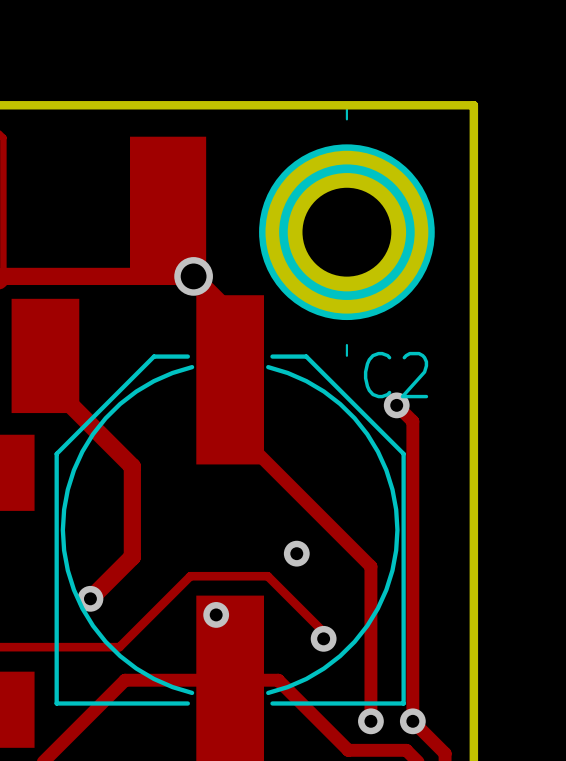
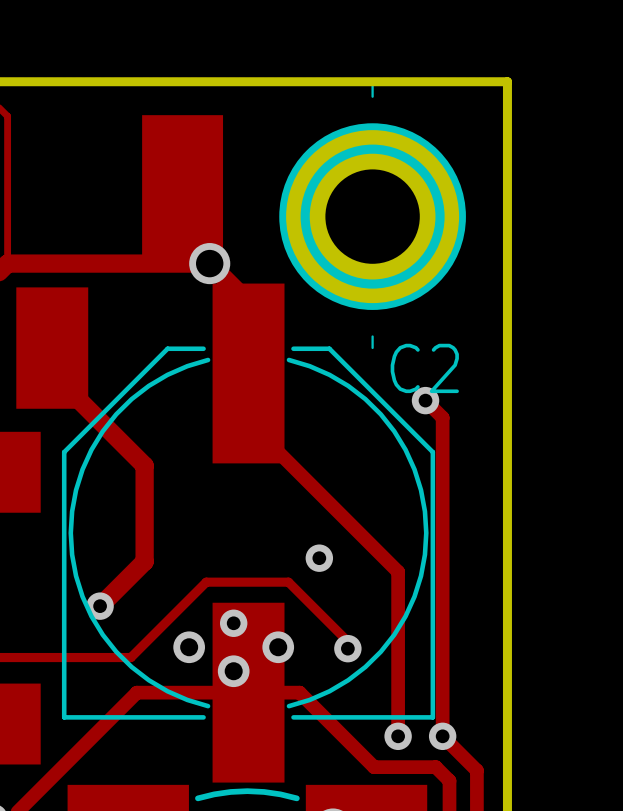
via: none -> (189, 647)
via: none -> (278, 647)
via: none -> (233, 671)

